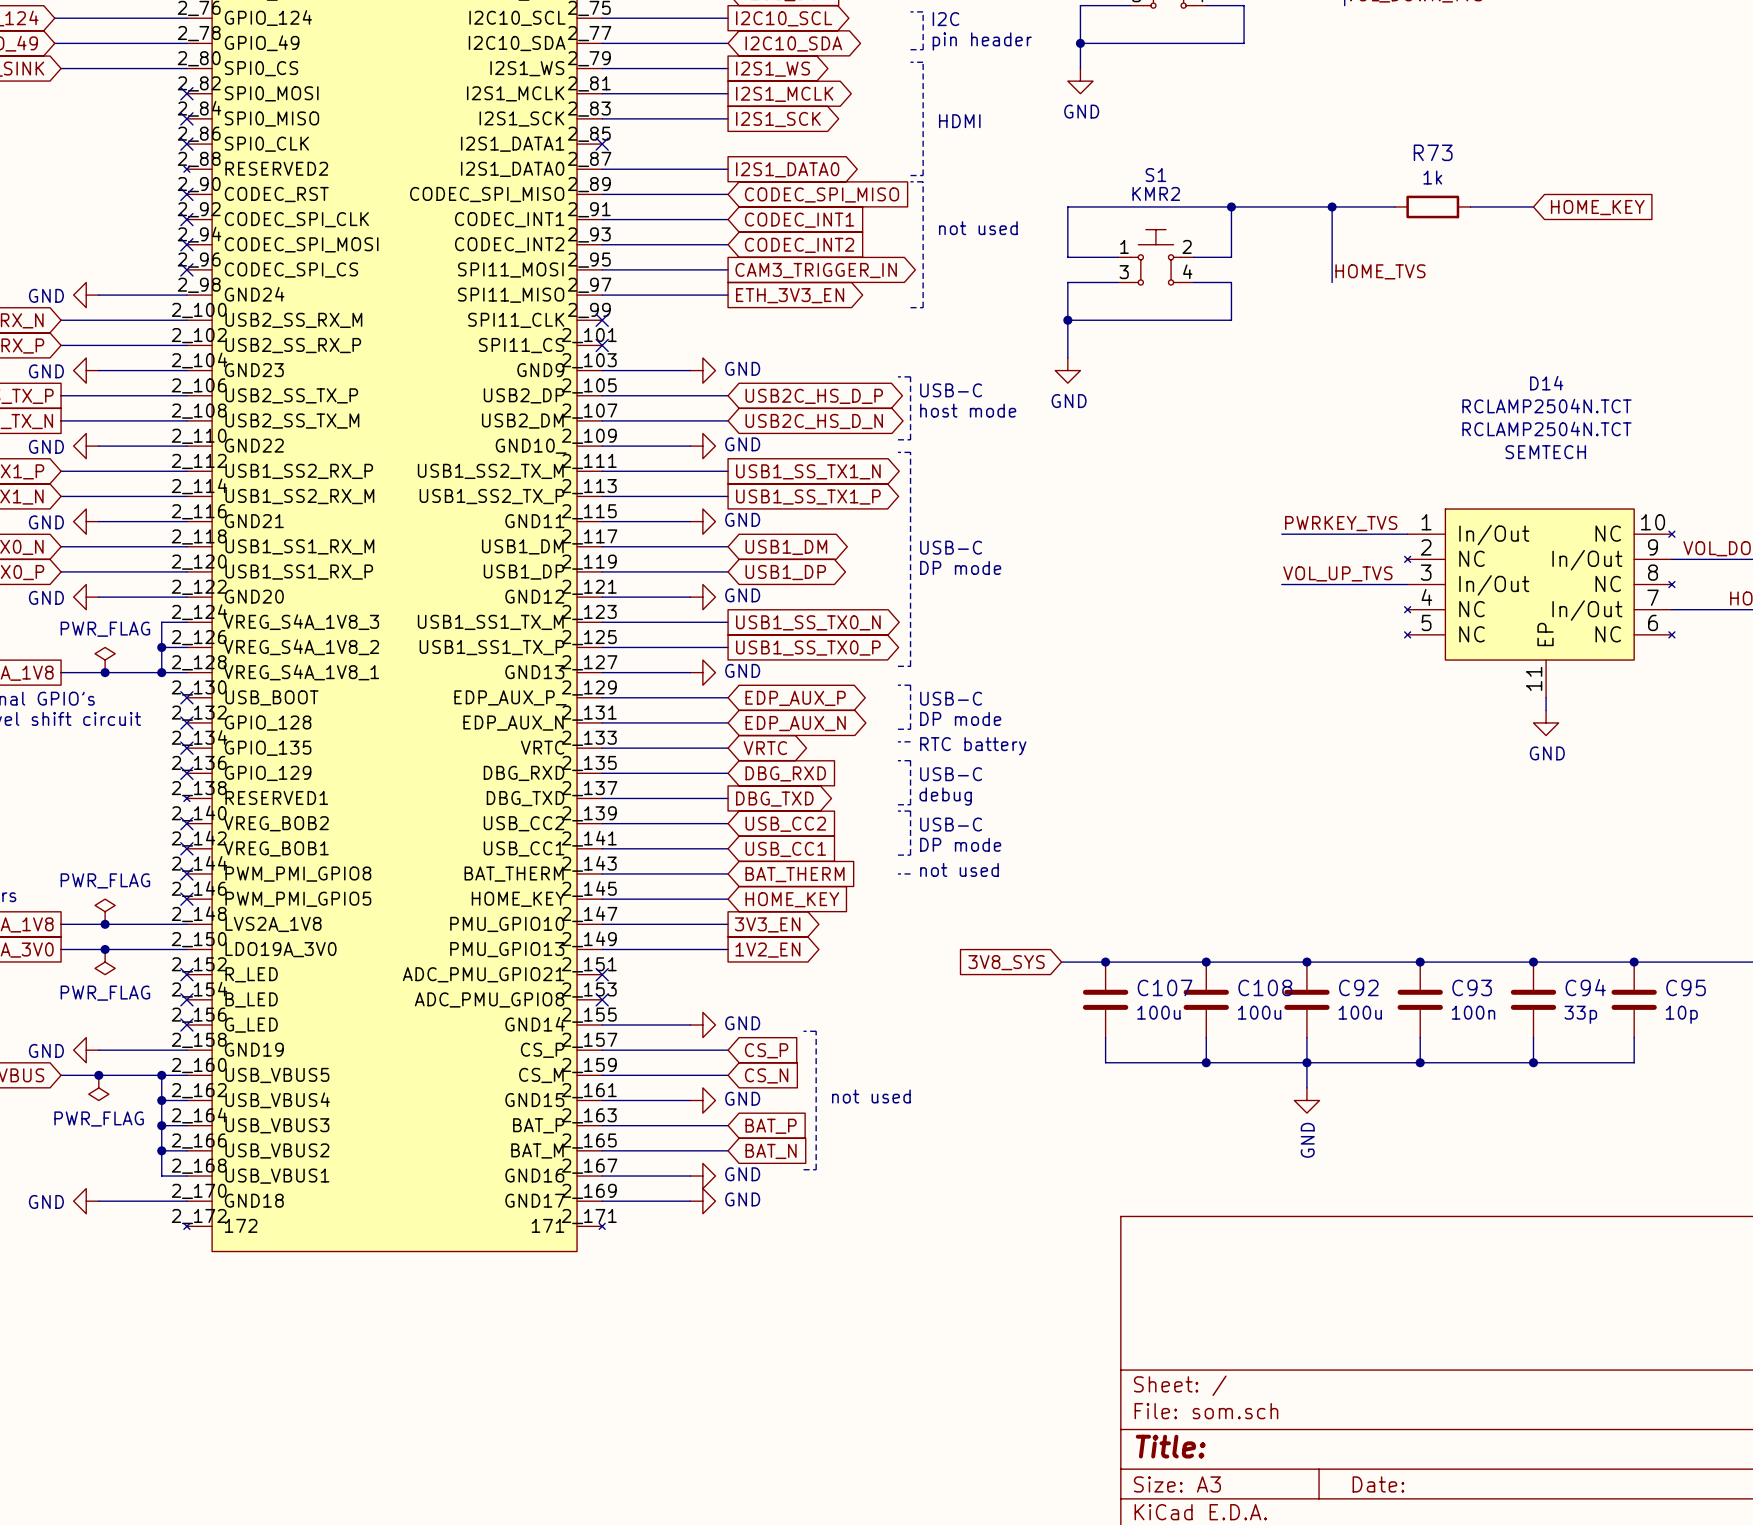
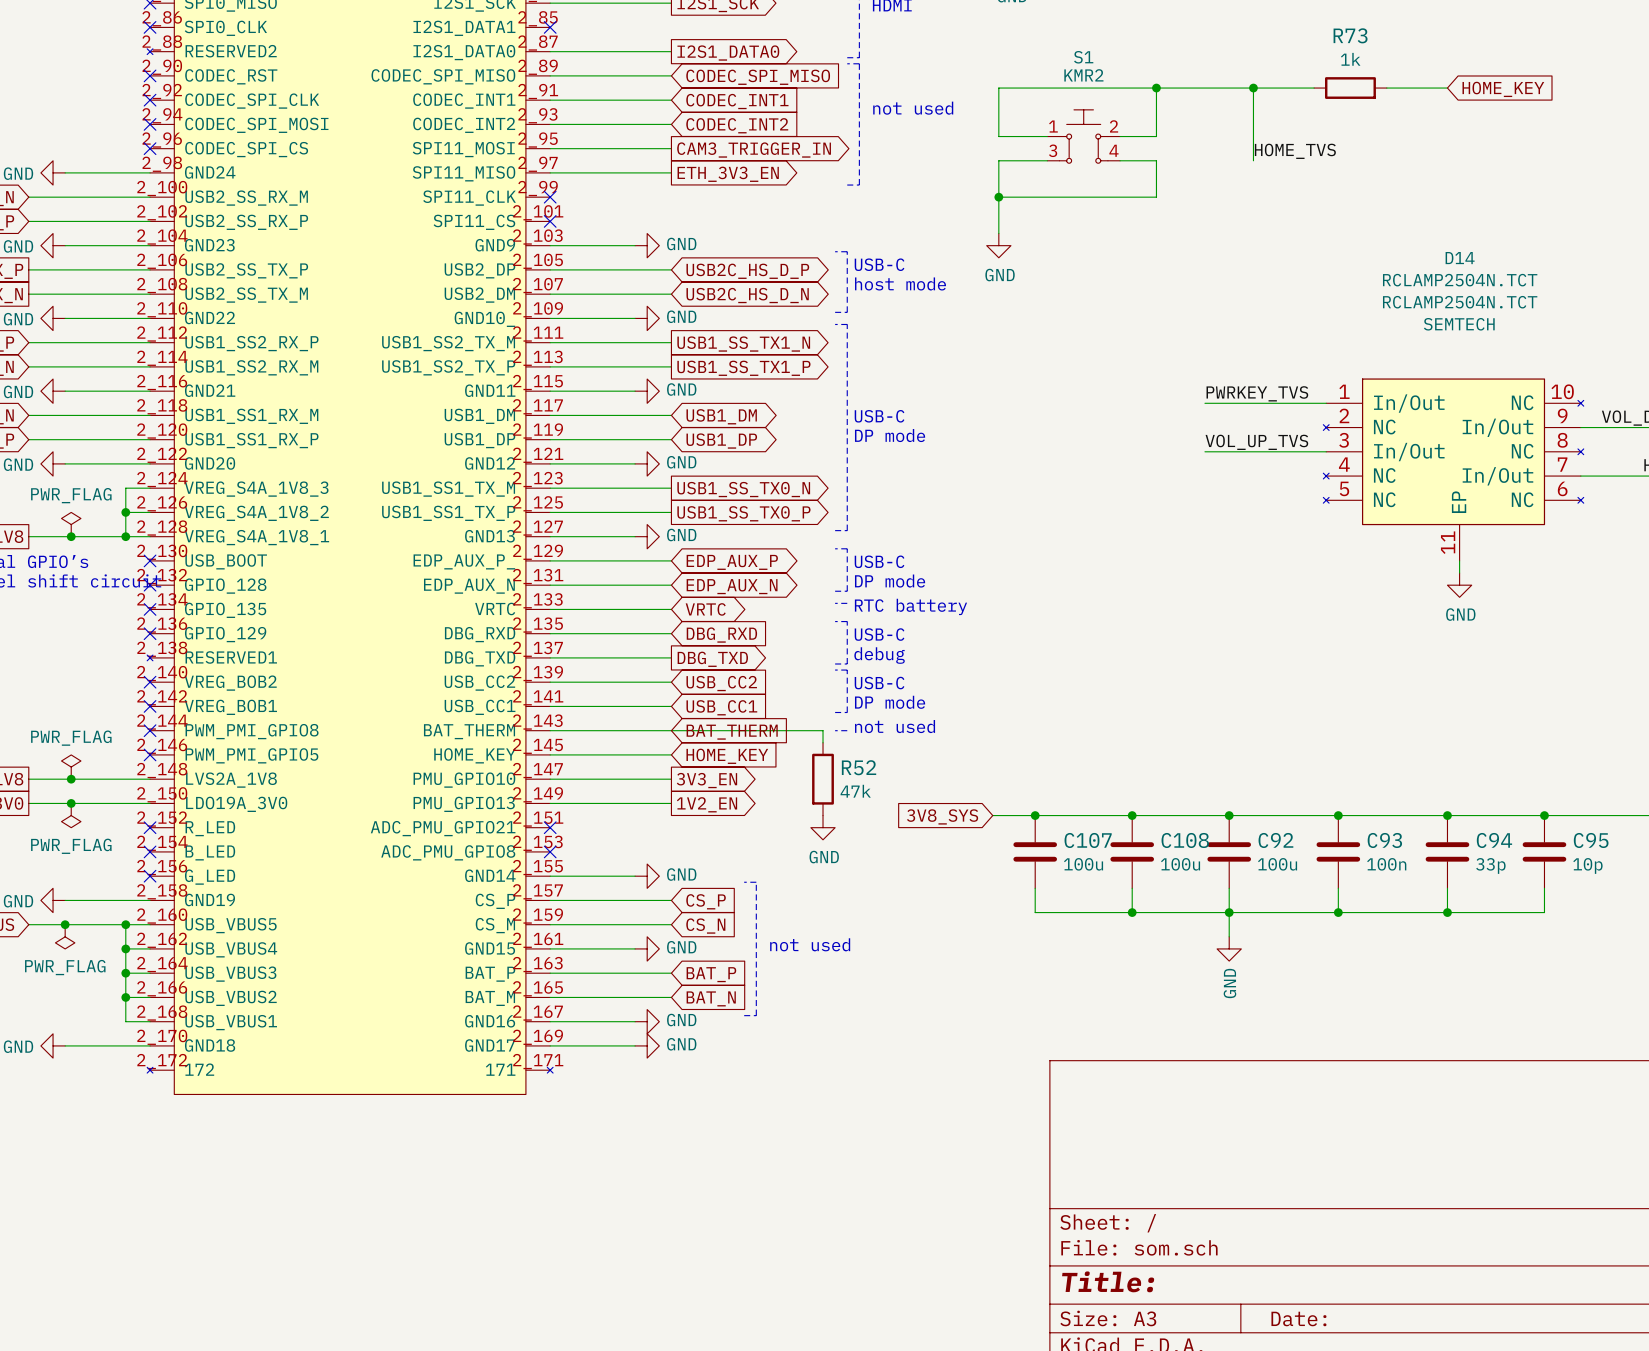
wire: none -> (671, 730) (823, 730) (823, 742)
R52: none -> (823, 779)
power symbol: none -> GND (823, 827)

